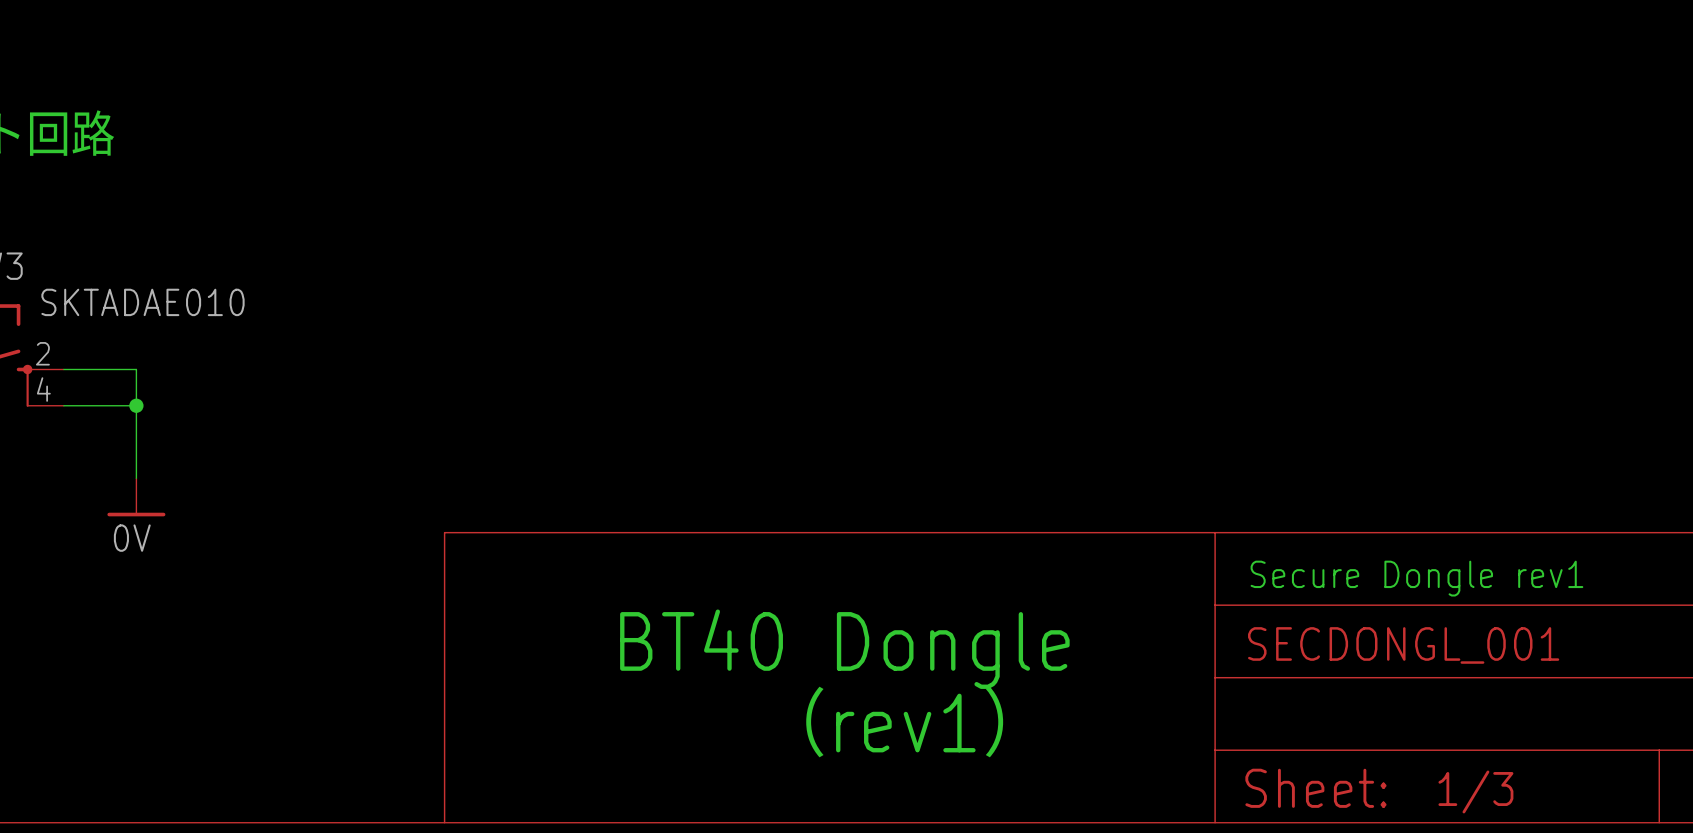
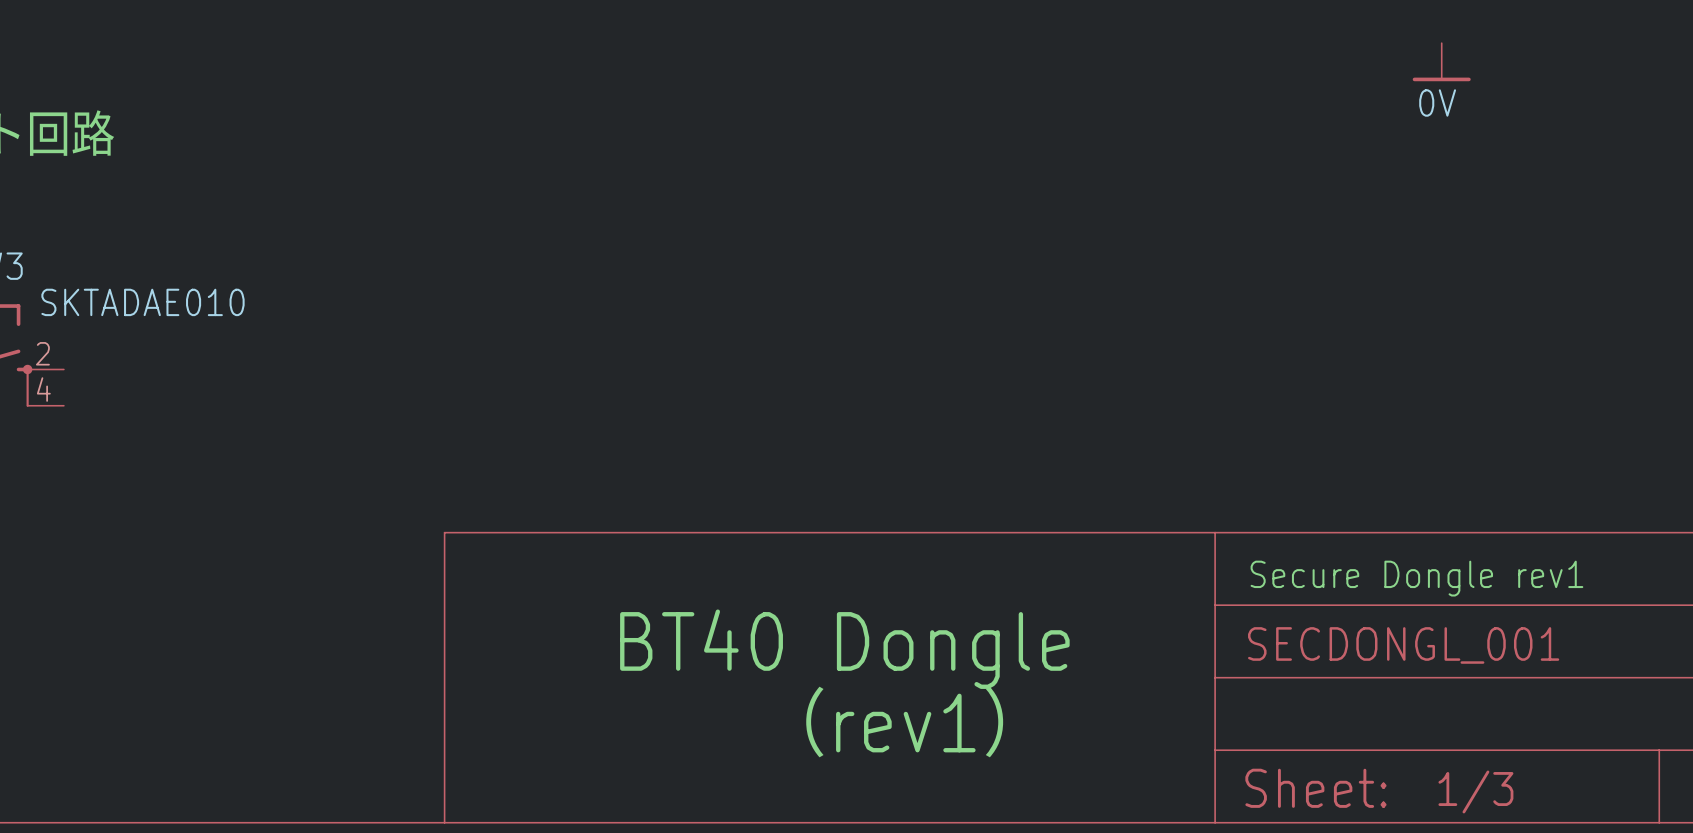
power symbol: none -> 0V (1441, 62)
wire: (63, 369) (136, 369) (136, 478) -> none
wire: (63, 405) (136, 405) -> none
junction: (136, 405) -> none
power symbol: 0V (136, 497) -> none

